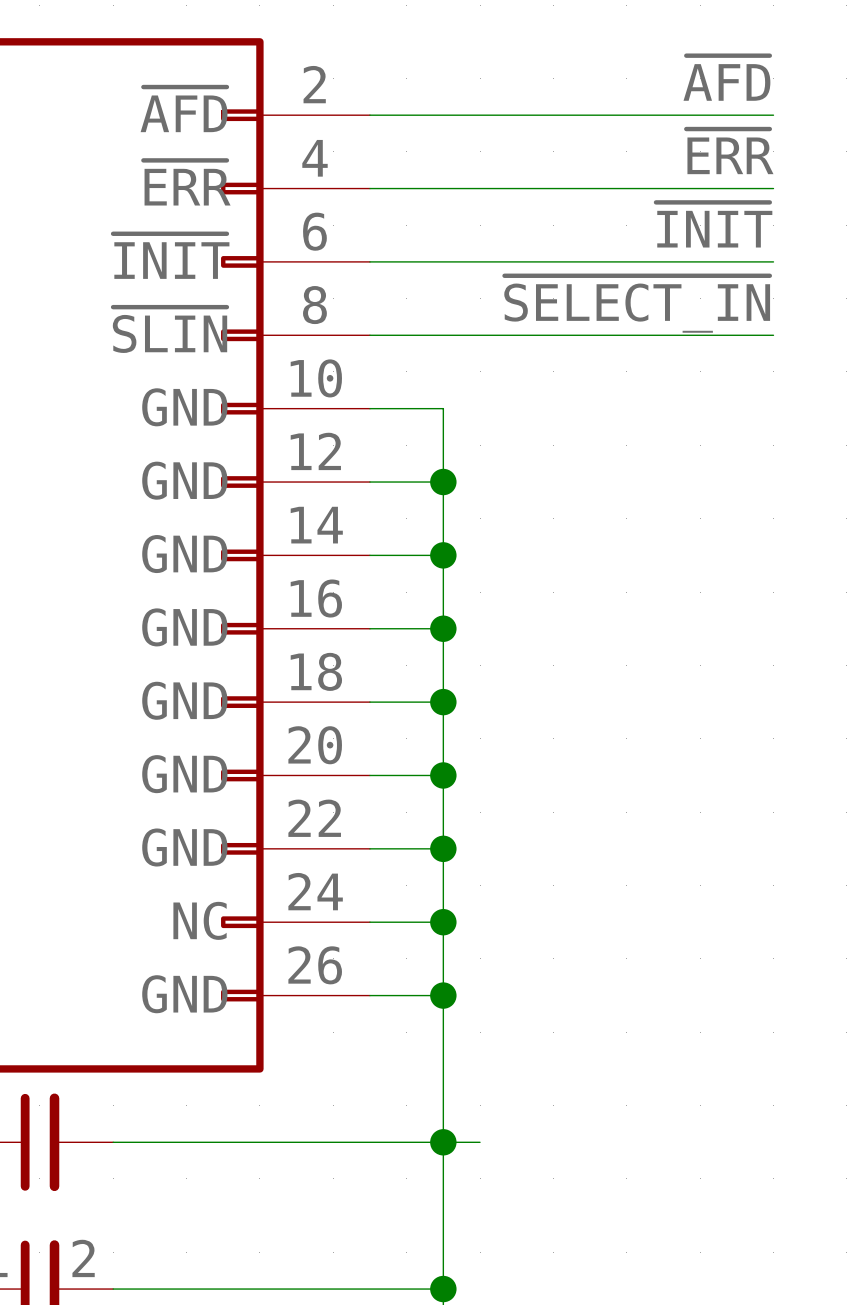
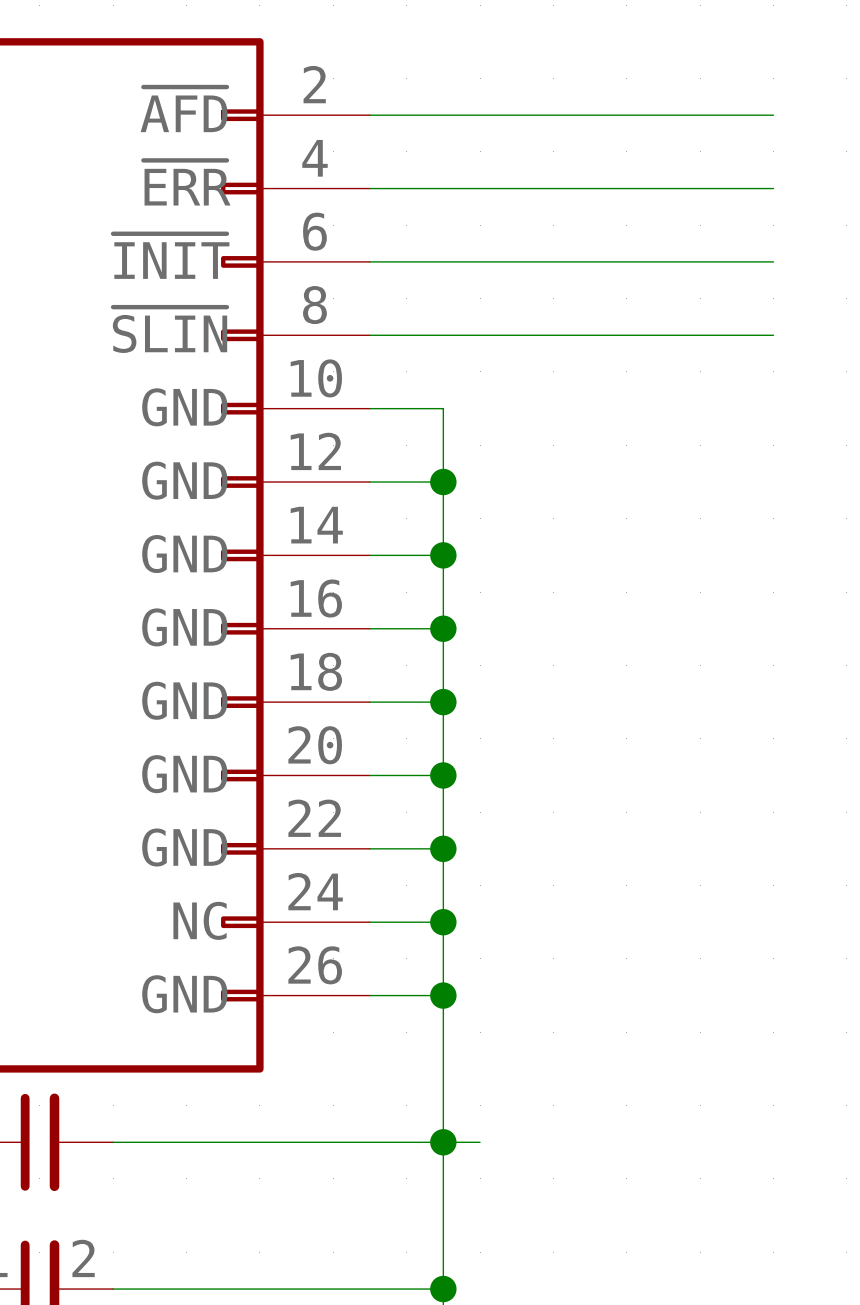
label: ~{AFD} (726, 78) -> none
label: ~{ERR} (729, 151) -> none
label: ~{INIT} (714, 224) -> none
label: ~{SELECT_IN} (637, 304) -> none

